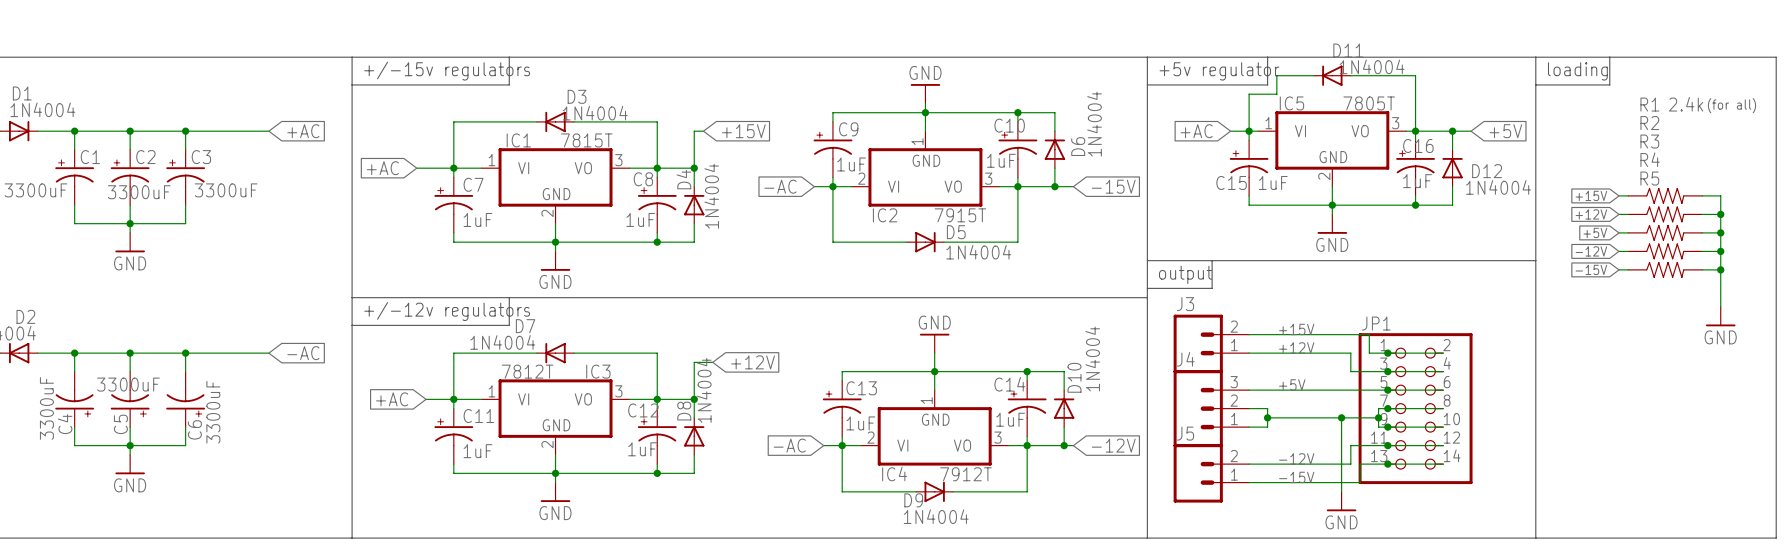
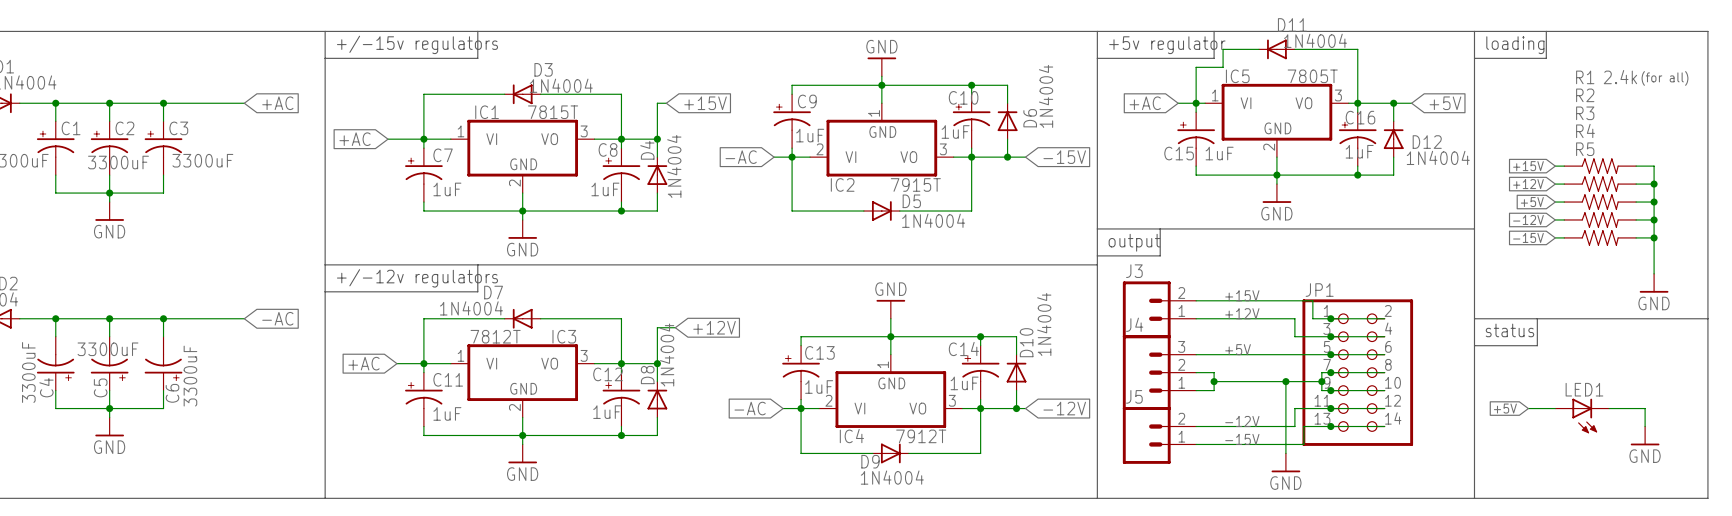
line: none -> (1474, 318) (1707, 318)
line: none -> (1537, 318) (1537, 345) (1474, 345)
text: none -> status (1509, 330)
global label: none -> +5V (1505, 408)
wire: none -> (1528, 408) (1555, 408)
wire: none -> (1609, 408) (1645, 408) (1645, 426)
LED1: none -> (1582, 416)
power symbol: none -> GND (1645, 435)

